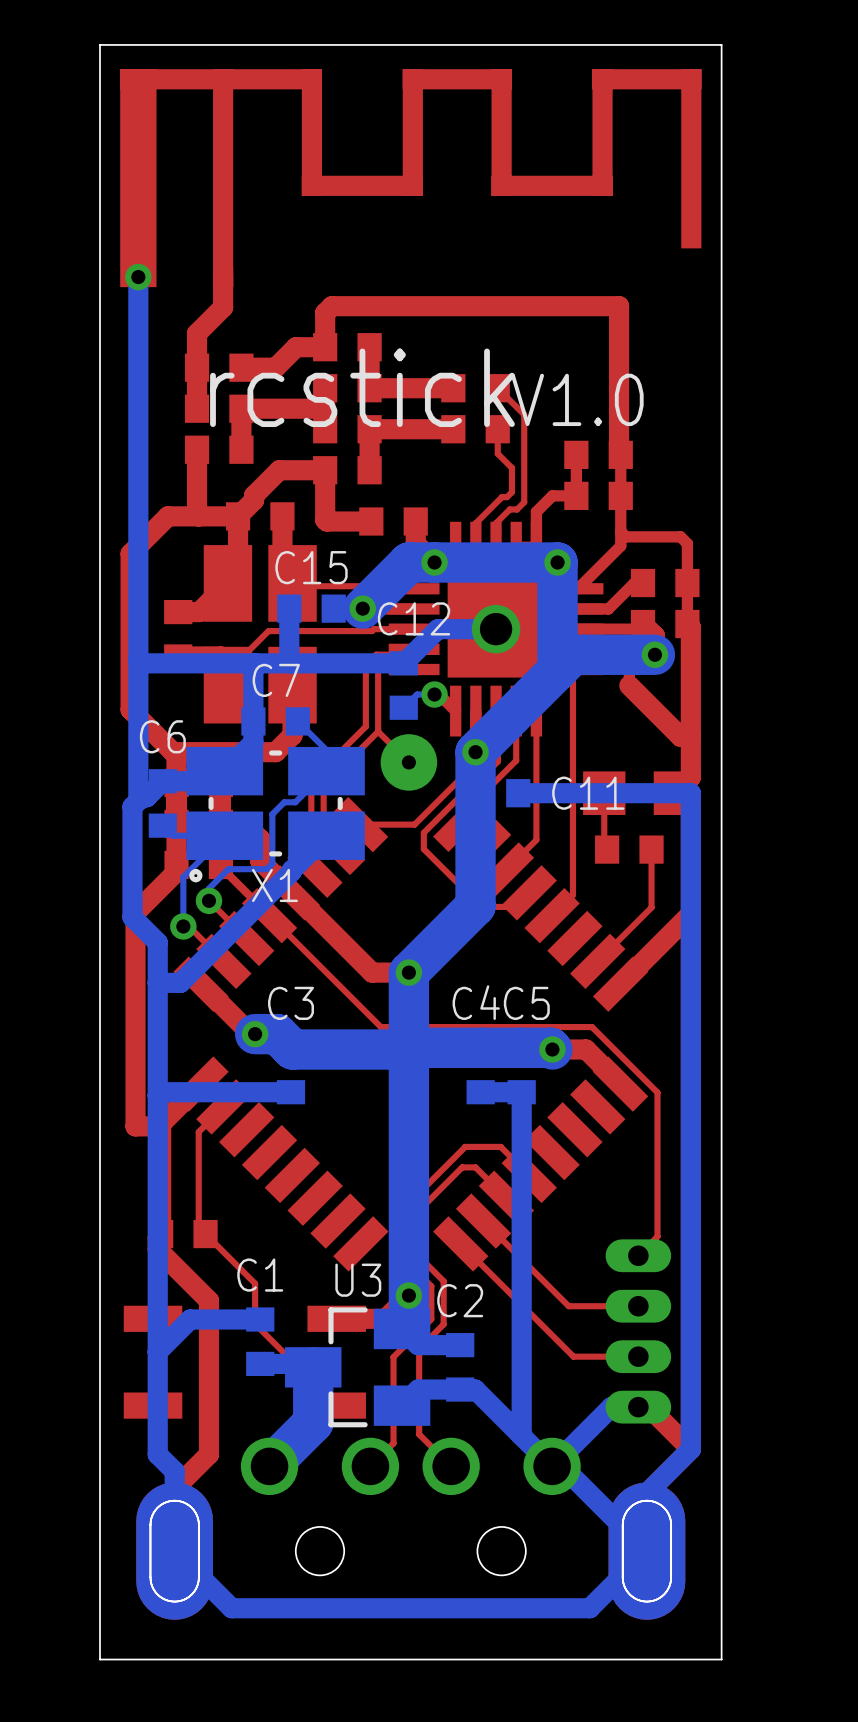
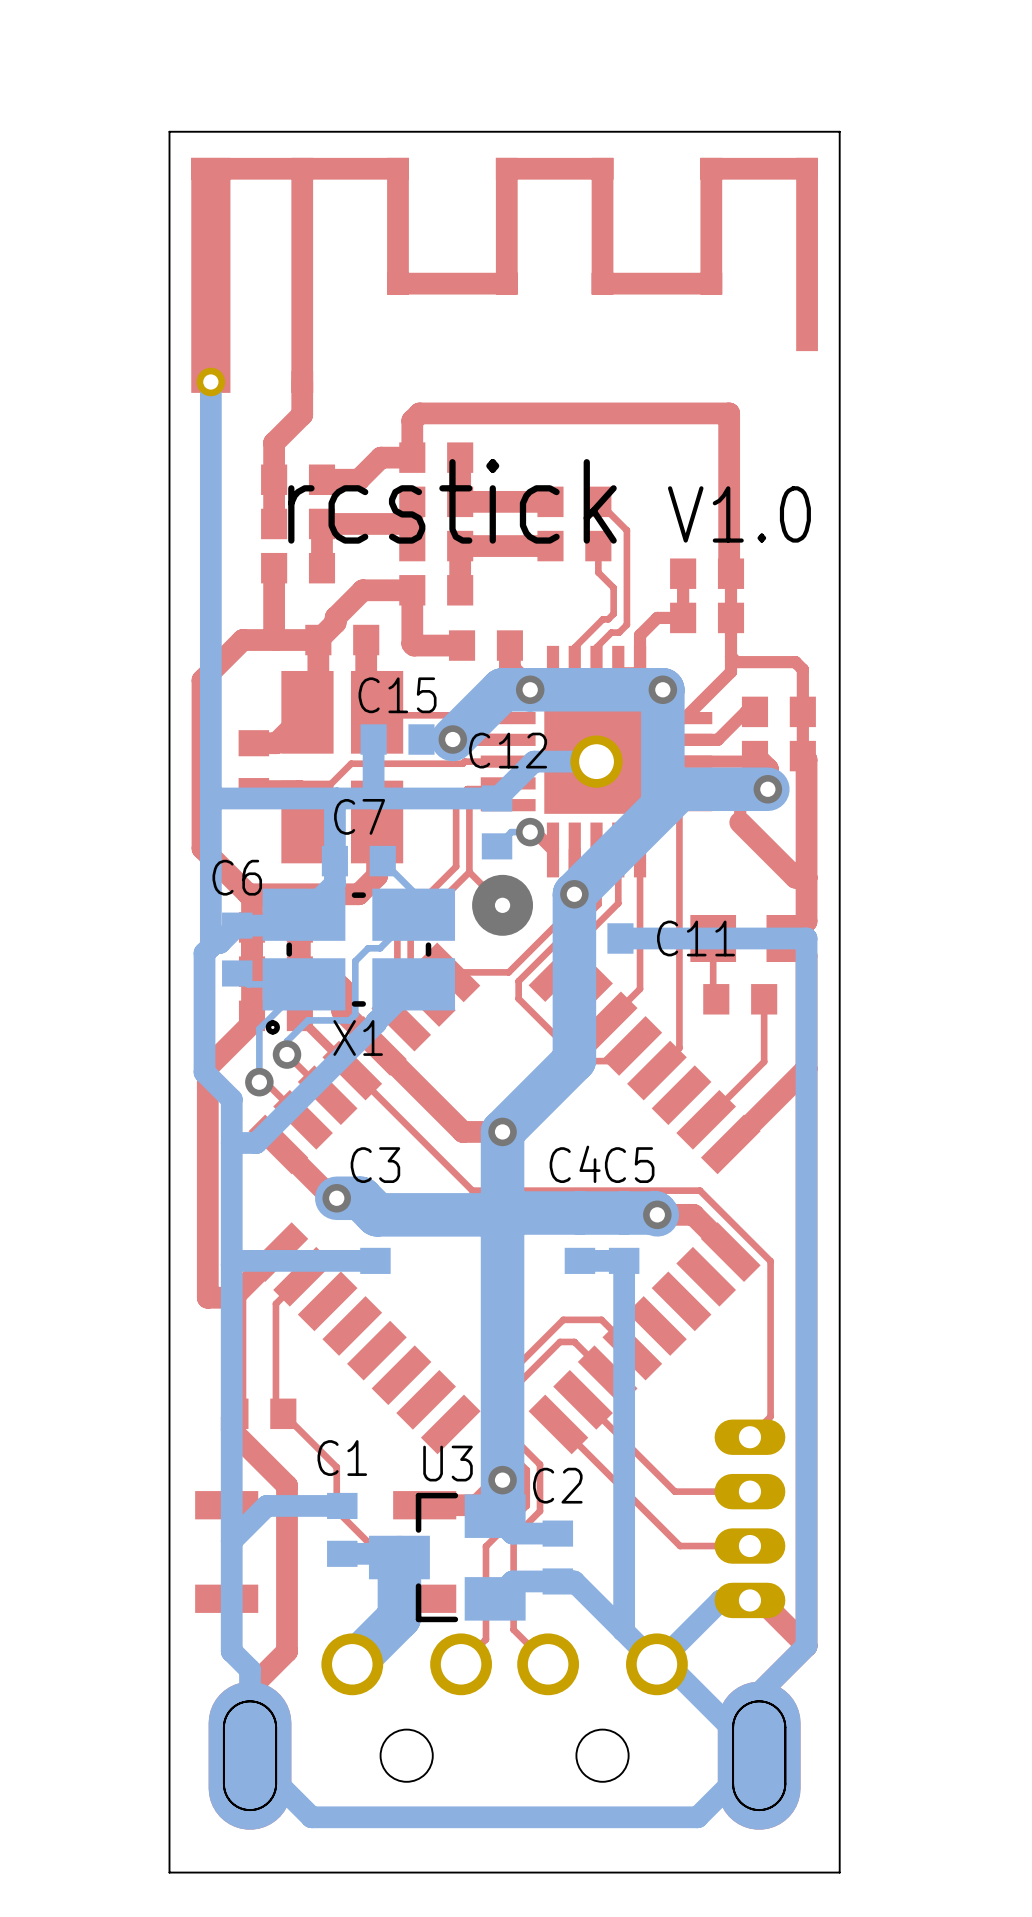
text position: V1.0 (577, 399) -> V1.0 (739, 514)

